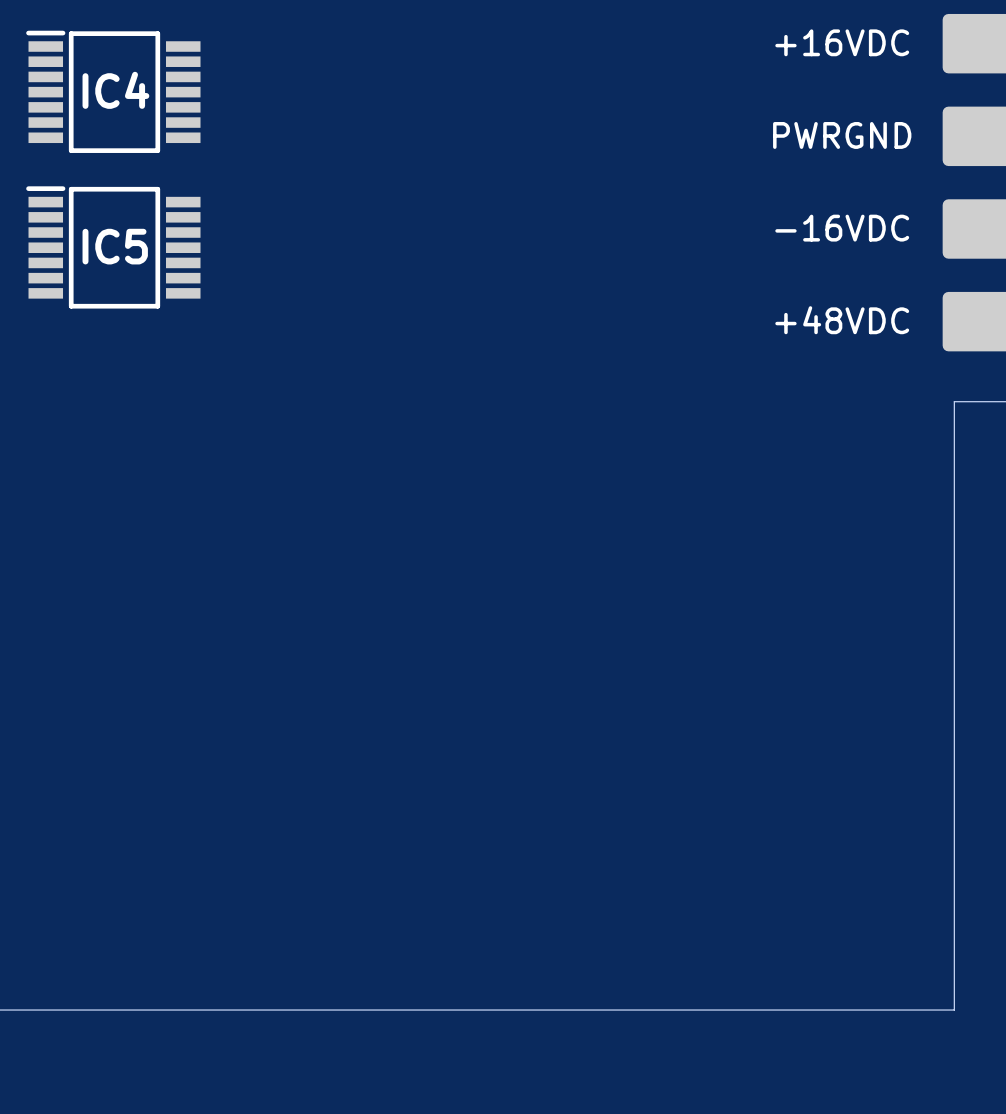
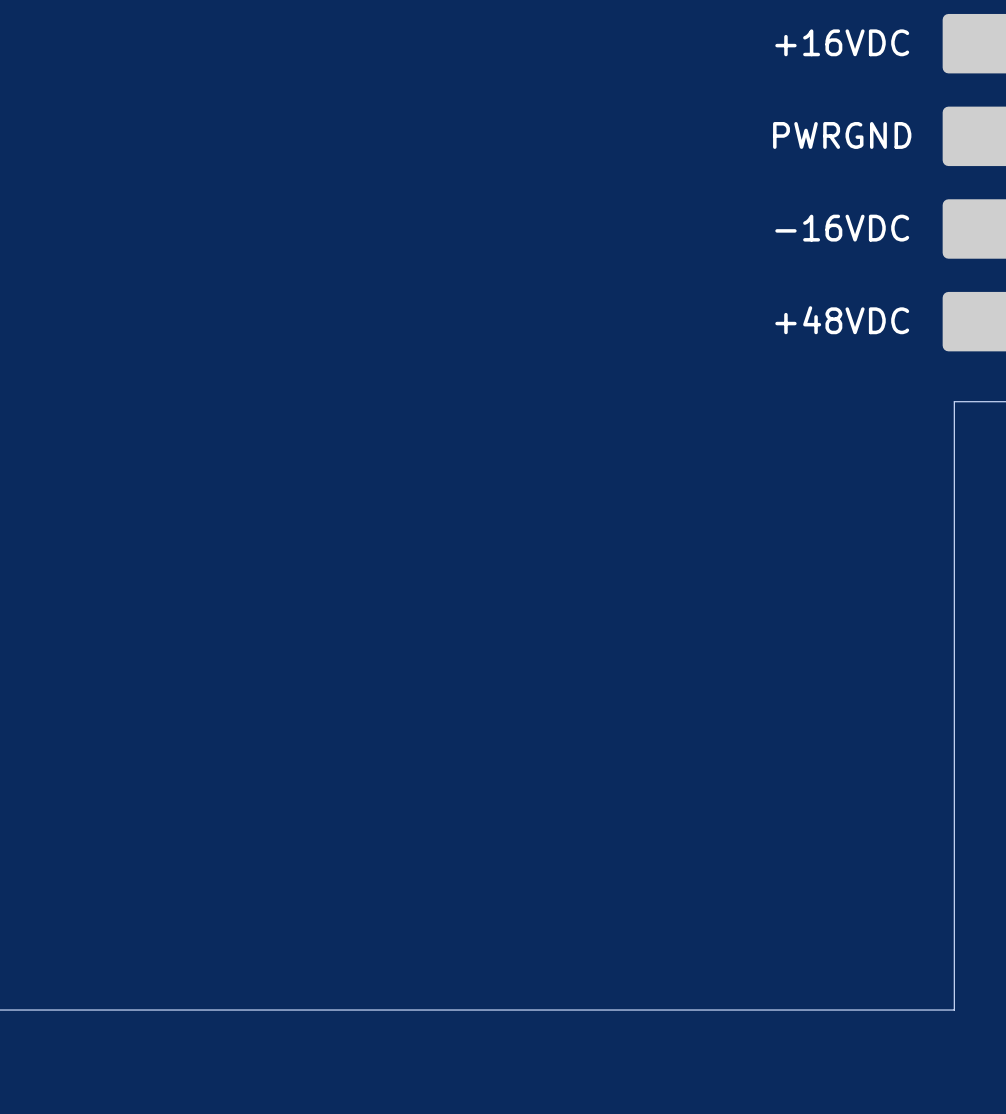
IC4: (113, 91) -> none
IC5: (113, 247) -> none

